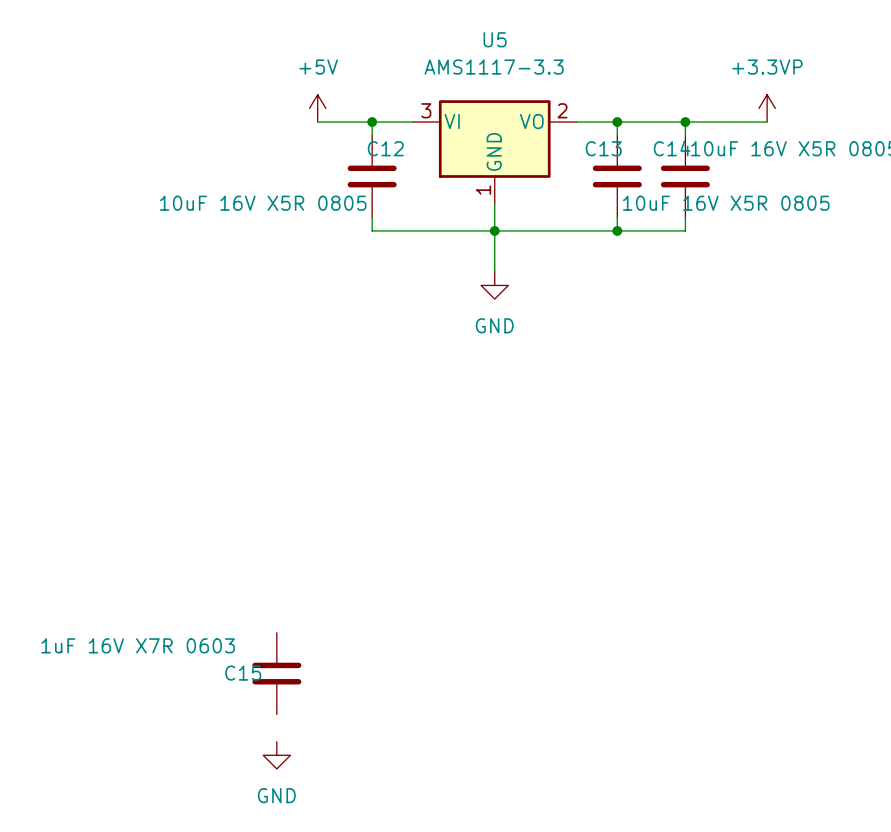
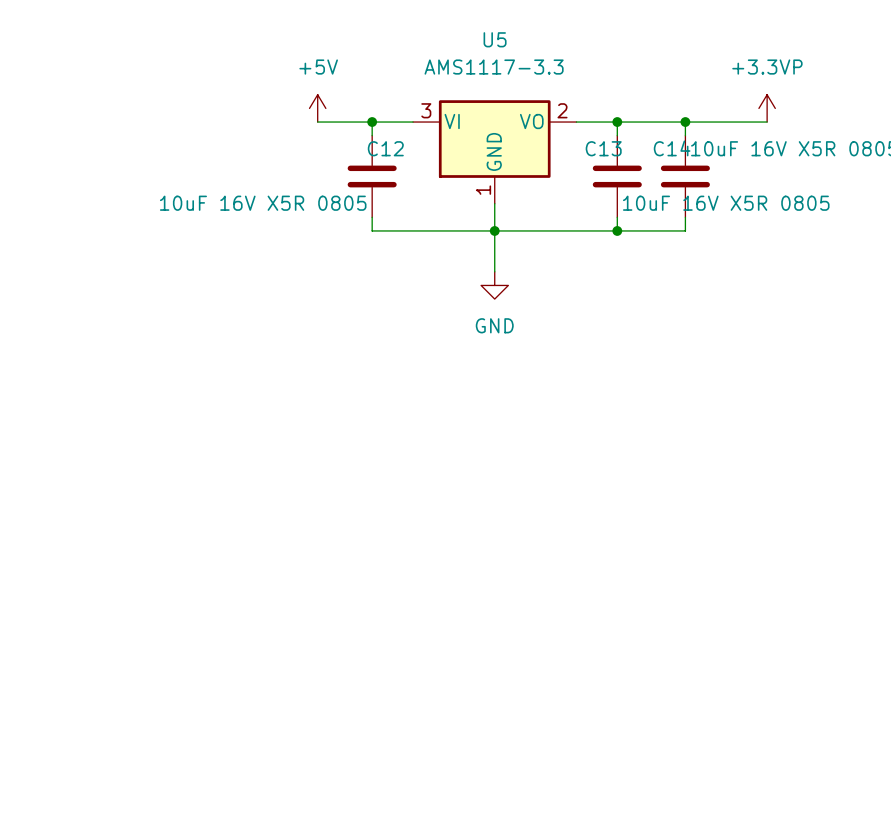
C15: 1uF 16V X7R 0603 (276, 673) -> none
power symbol: GND (276, 755) -> none

